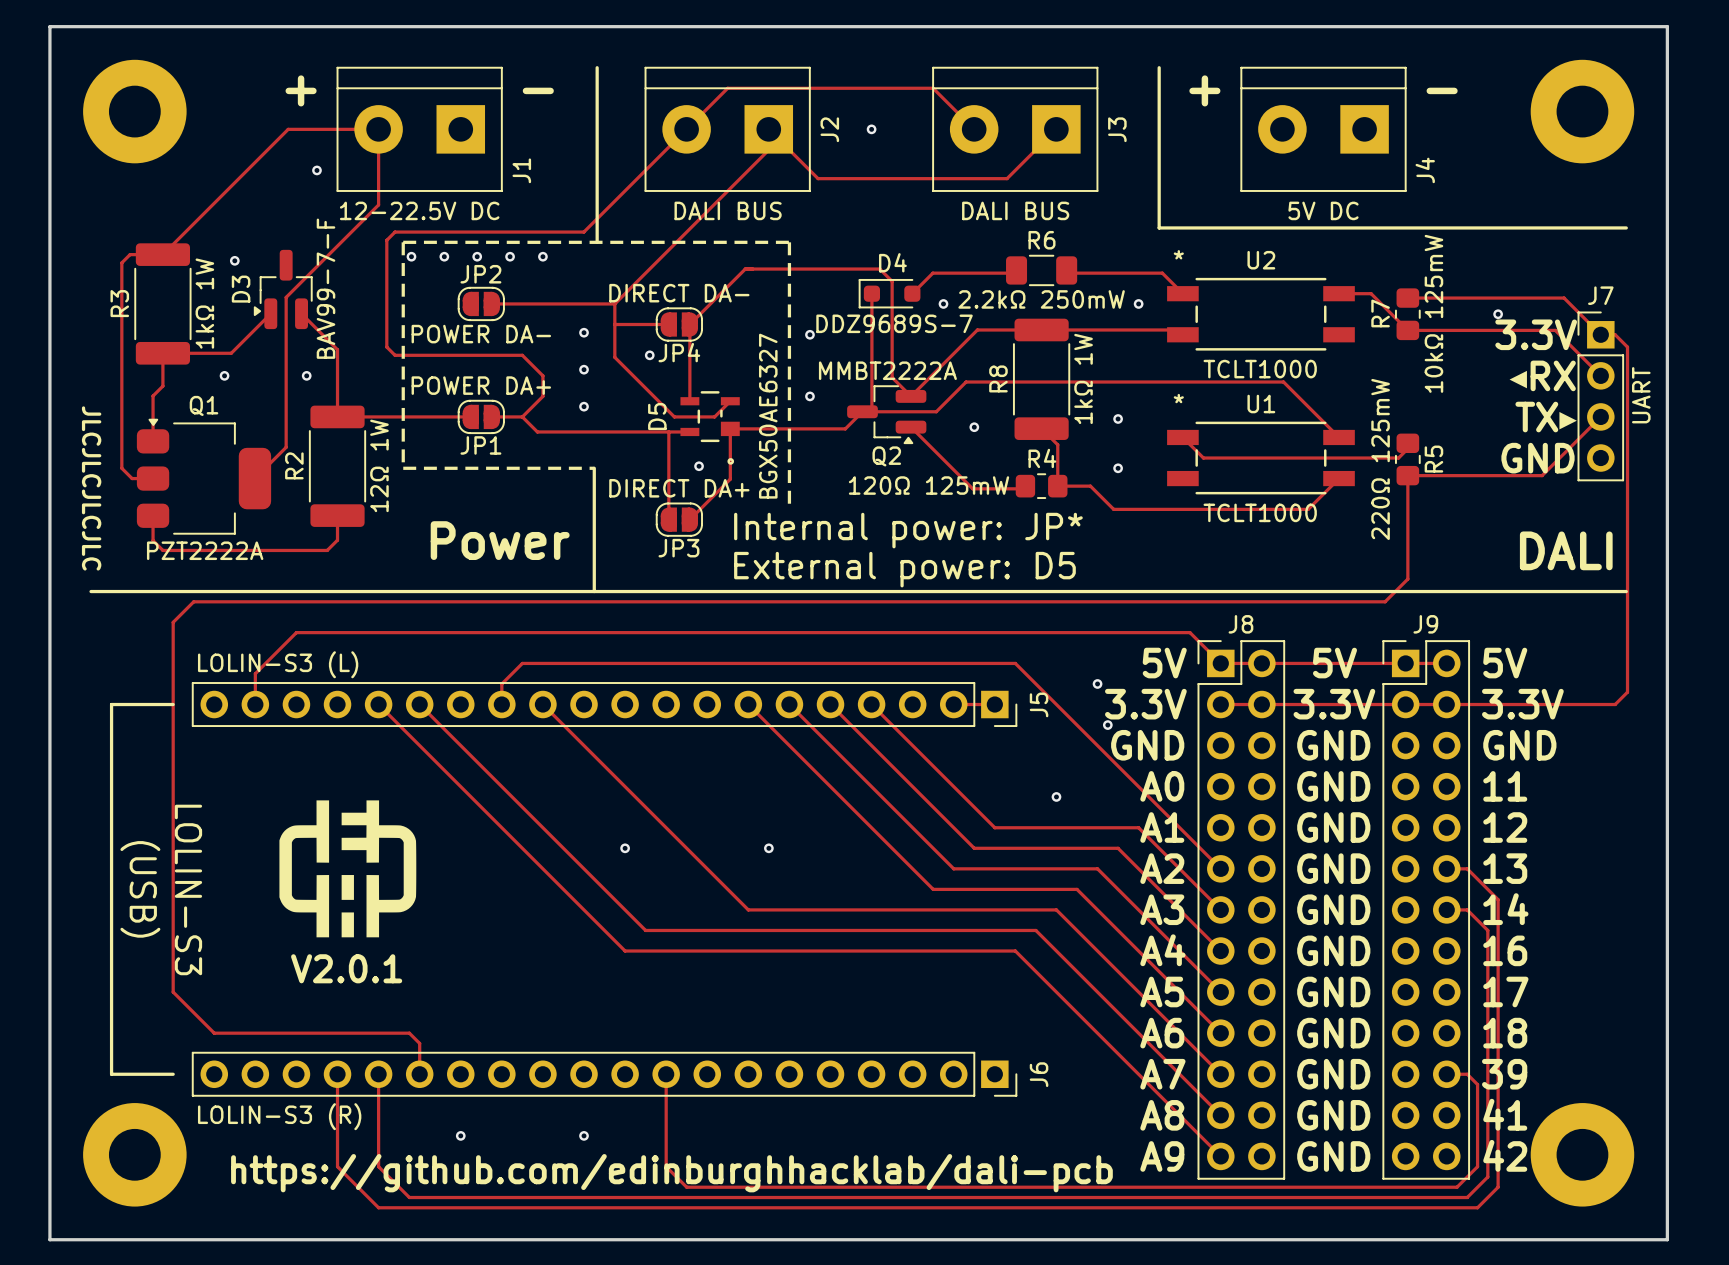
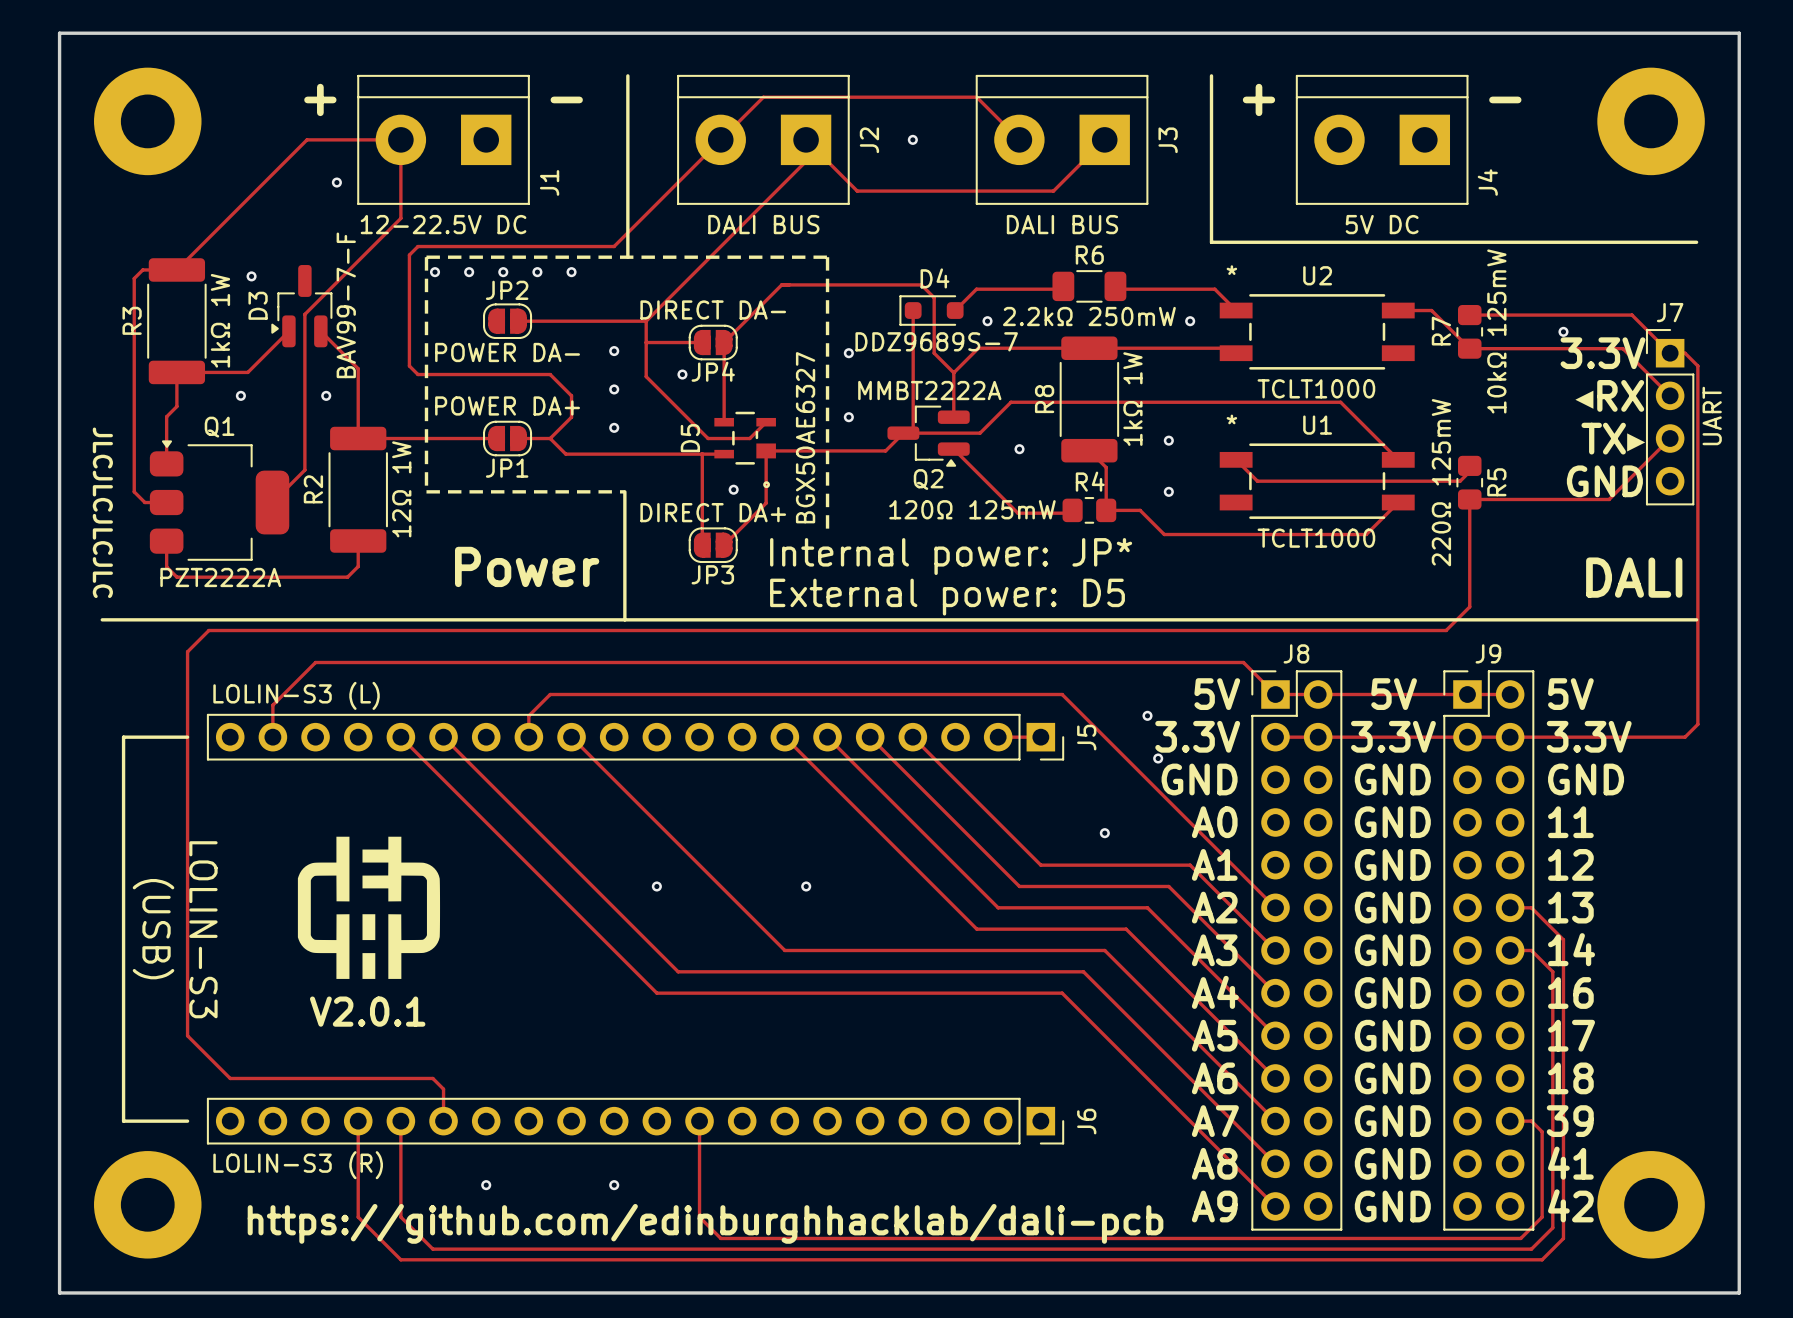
track: (977, 329) (911, 396) (892, 377) (892, 334) -> (1022, 348) (978, 348) (953, 372)
track: none -> (934, 353) (953, 372)
track: none -> (953, 372) (953, 417)

